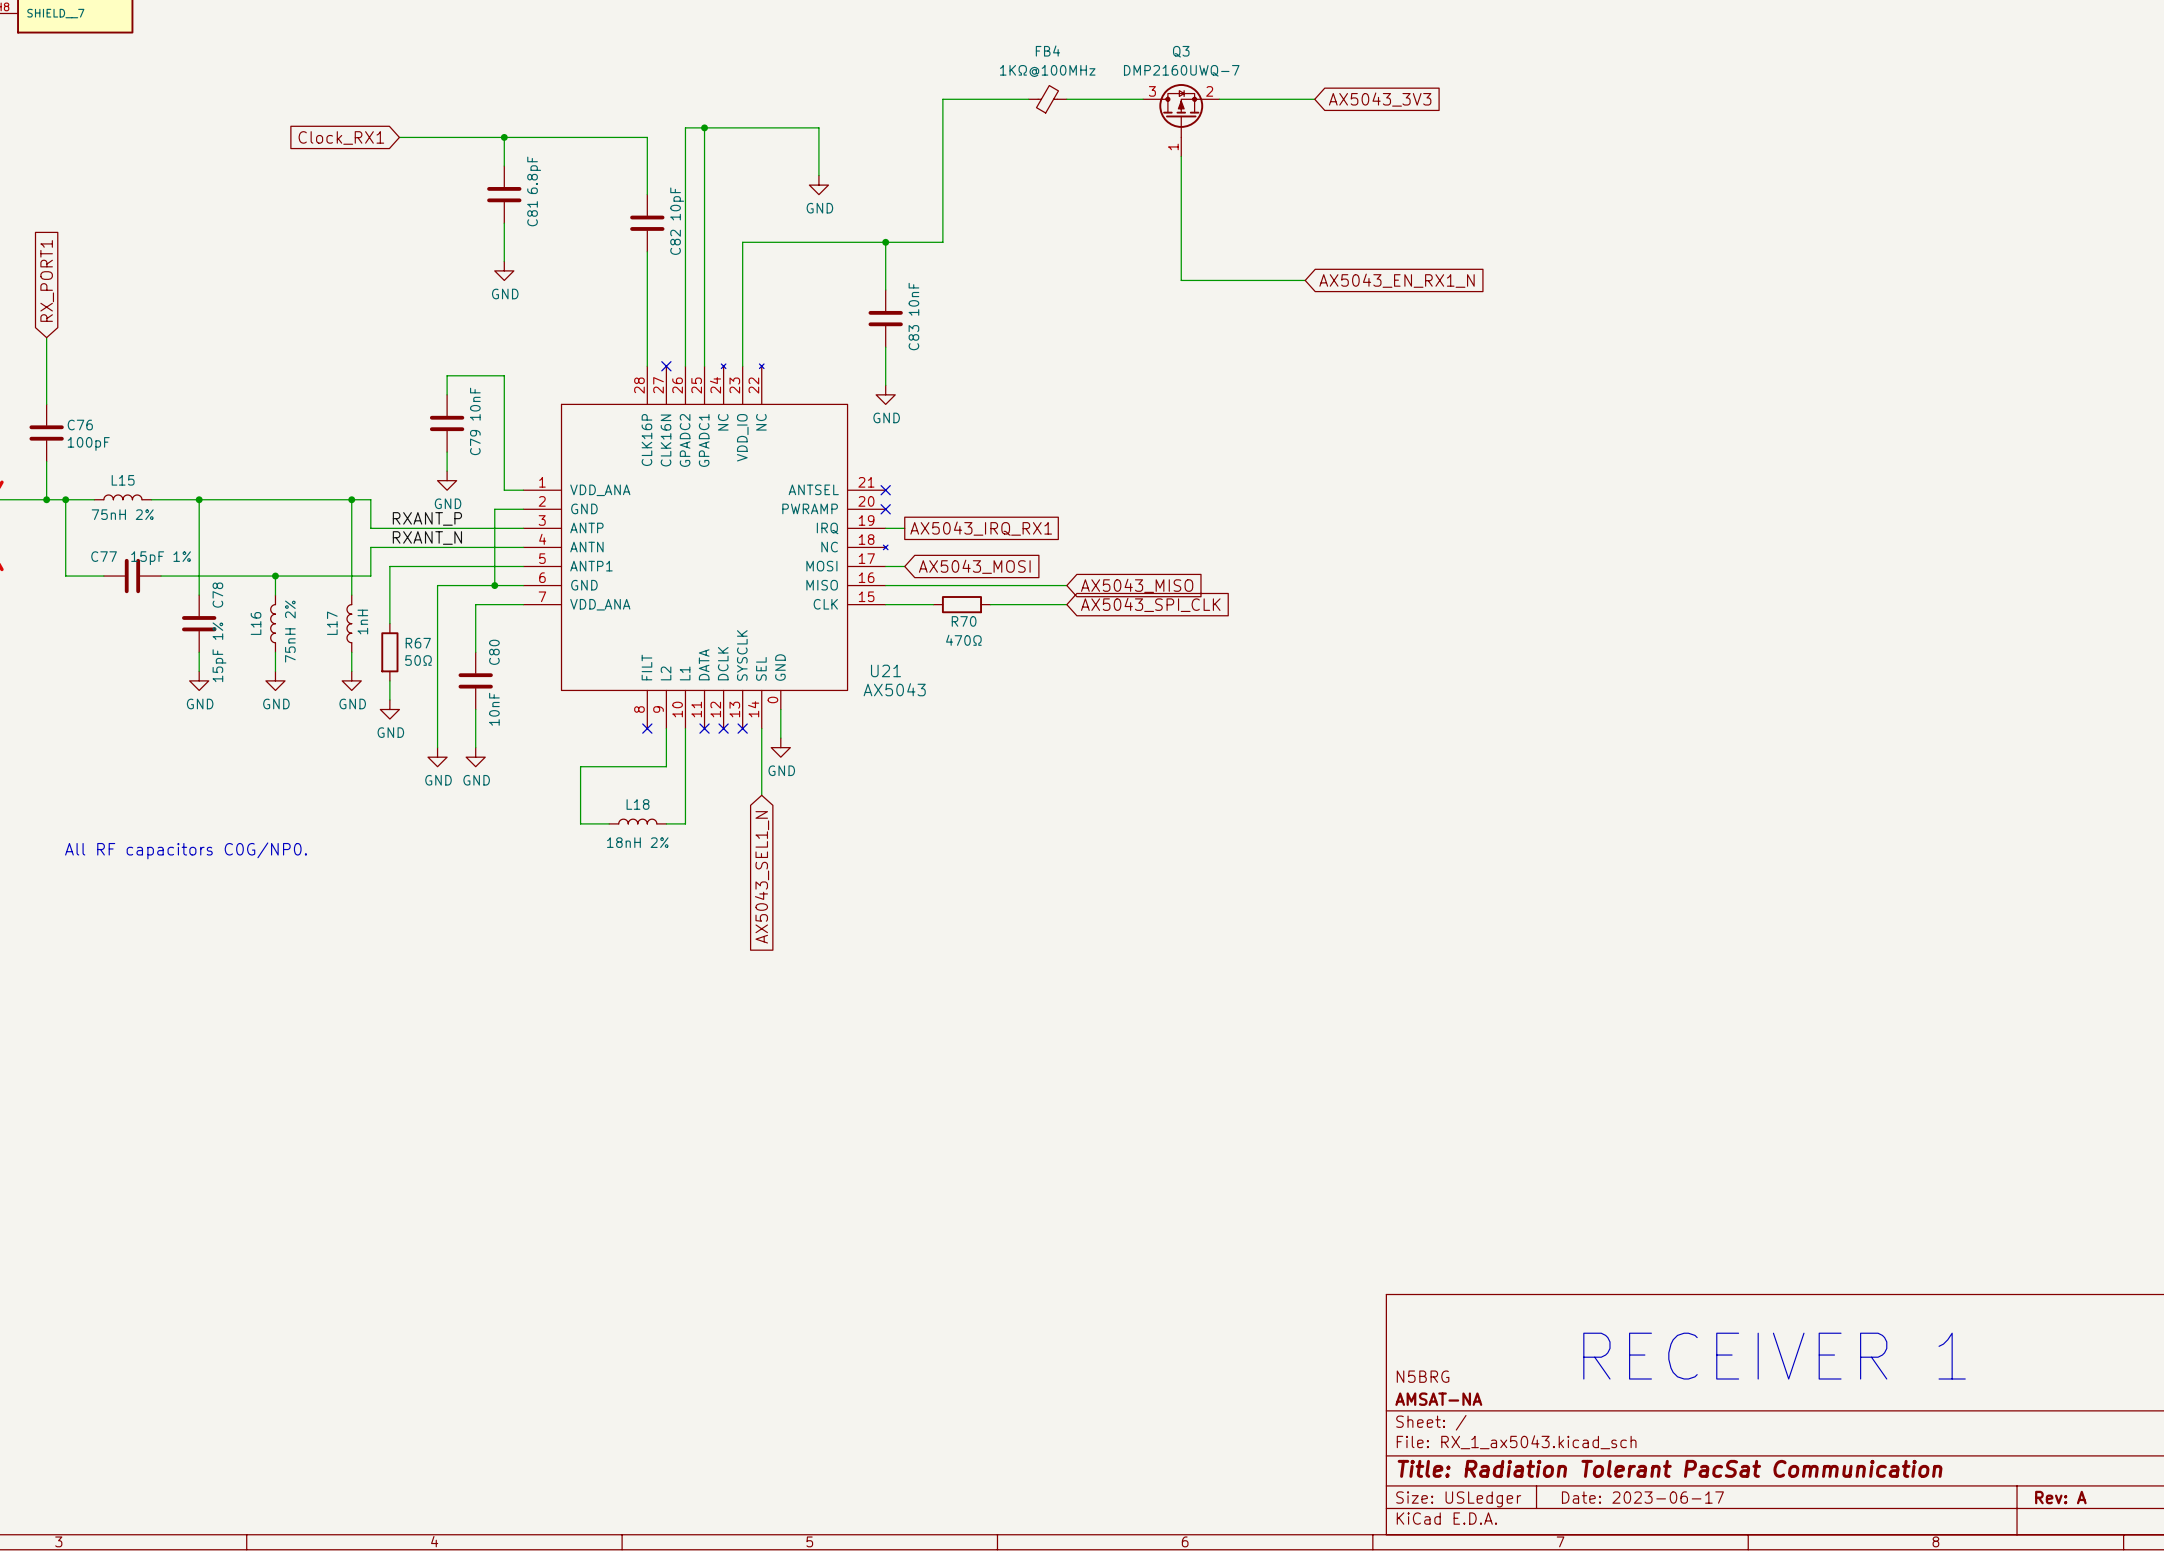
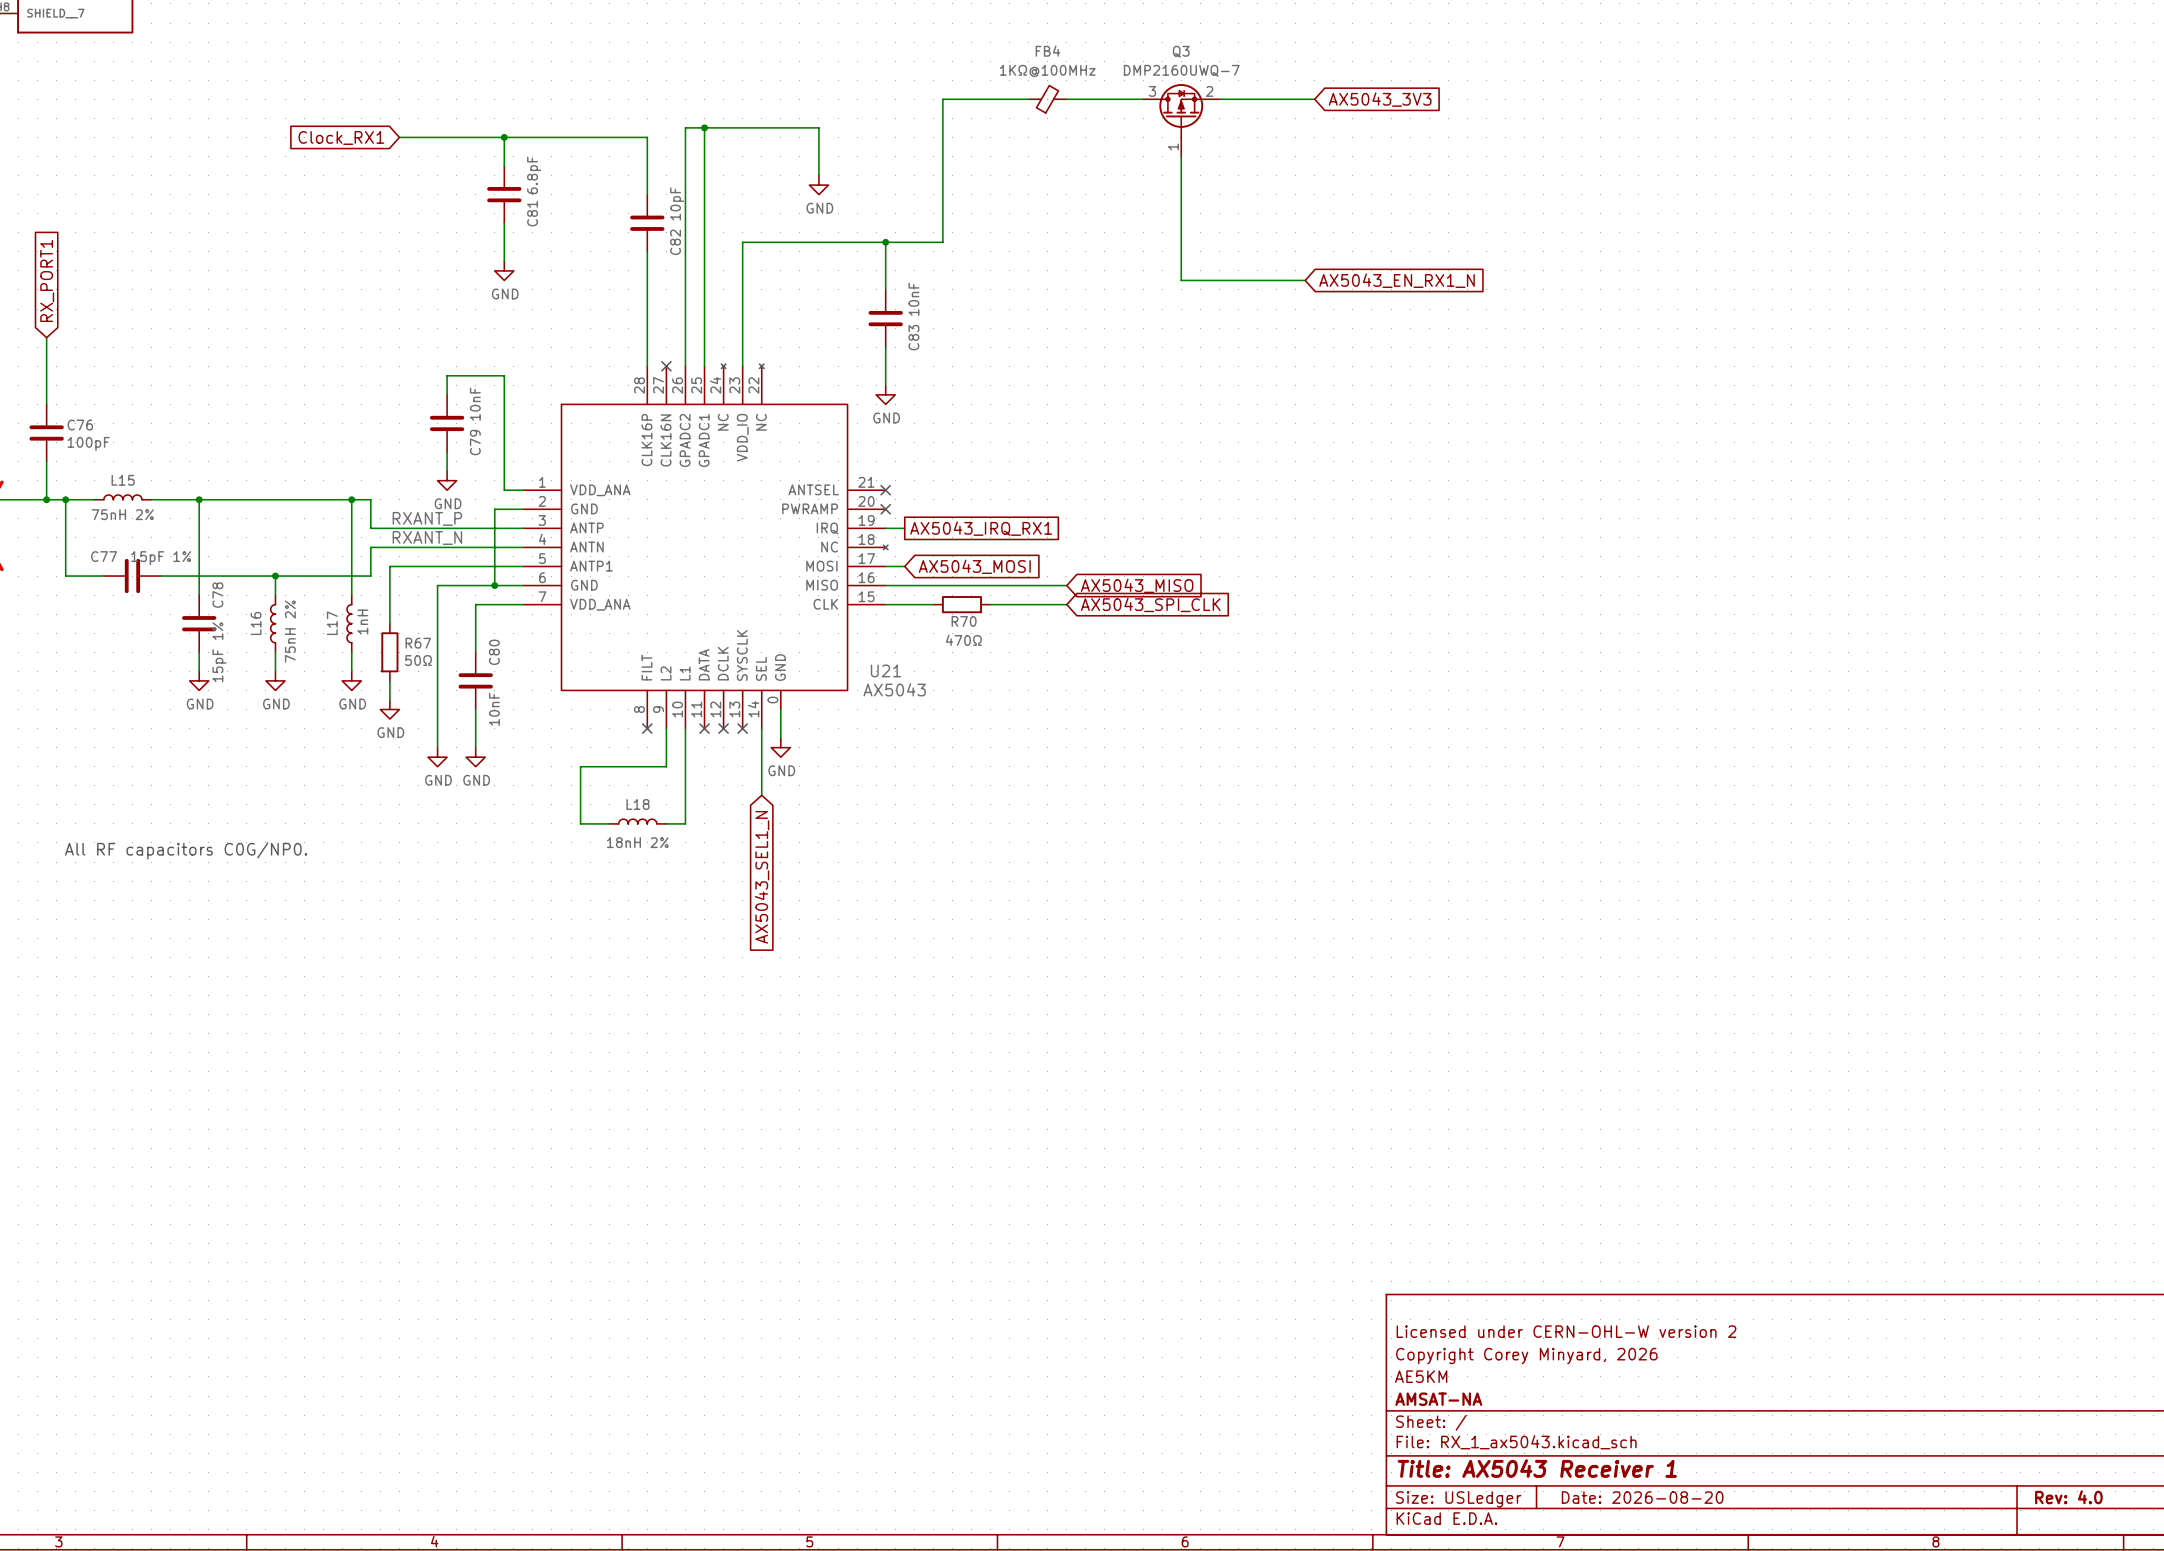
title block: none -> Licensed under CERN-OHL-W version 2 (1566, 1331)
title block: none -> Copyright Corey Minyard, 2026 (1526, 1356)
text: RECEIVER 1 (1774, 1356) -> none
title block: N5BRG (1423, 1376) -> AE5KM (1421, 1376)
title block: Title: Radiation Tolerant PacSat Communication (1670, 1468) -> Title: AX5043 Receiver 1 (1537, 1468)
title block: Date: 2023-06-17 (1642, 1497) -> Date: 2026-08-20 (1642, 1497)
title block: Rev: A (2060, 1497) -> Rev: 4.0 (2068, 1497)

